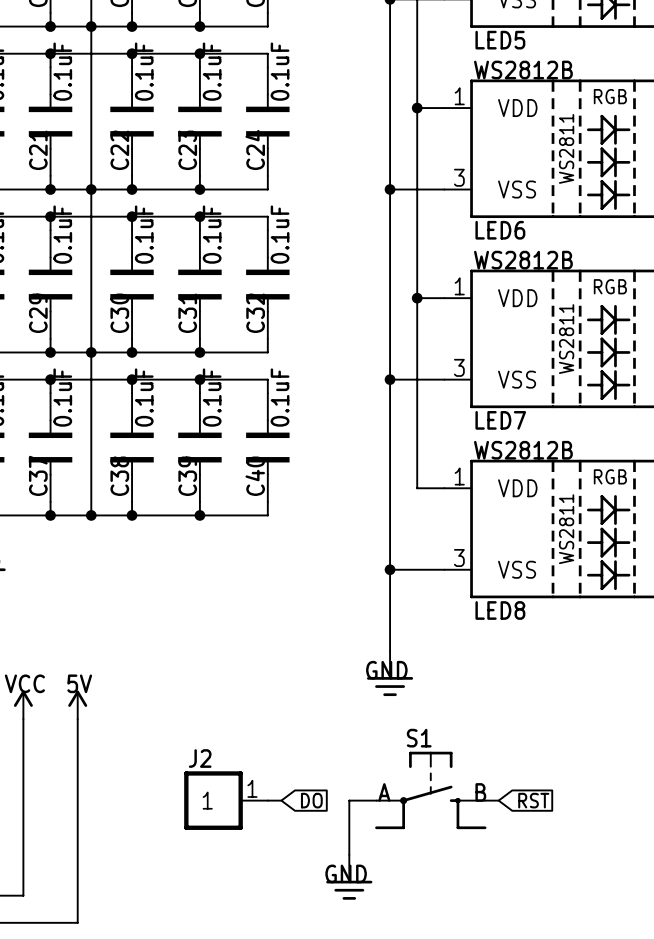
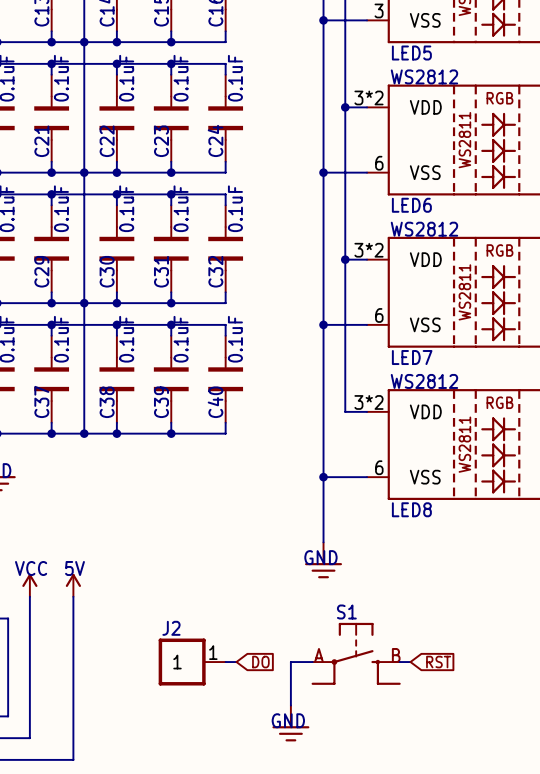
LED6 text: WS2812B (523, 70) -> WS2812 (424, 76)
LED6 pin number: 1 (459, 96) -> 3*2 (368, 97)
LED6 pin number: 3 (459, 177) -> 6 (379, 163)
LED7 text: WS2812B (523, 260) -> WS2812 (424, 229)
LED7 pin number: 1 (459, 286) -> 3*2 (368, 250)
LED7 pin number: 3 (459, 367) -> 6 (379, 315)
LED8 text: WS2812B (523, 450) -> WS2812 (424, 381)
LED8 pin number: 1 (459, 476) -> 3*2 (368, 402)
LED8 pin number: 3 (459, 557) -> 6 (379, 467)

